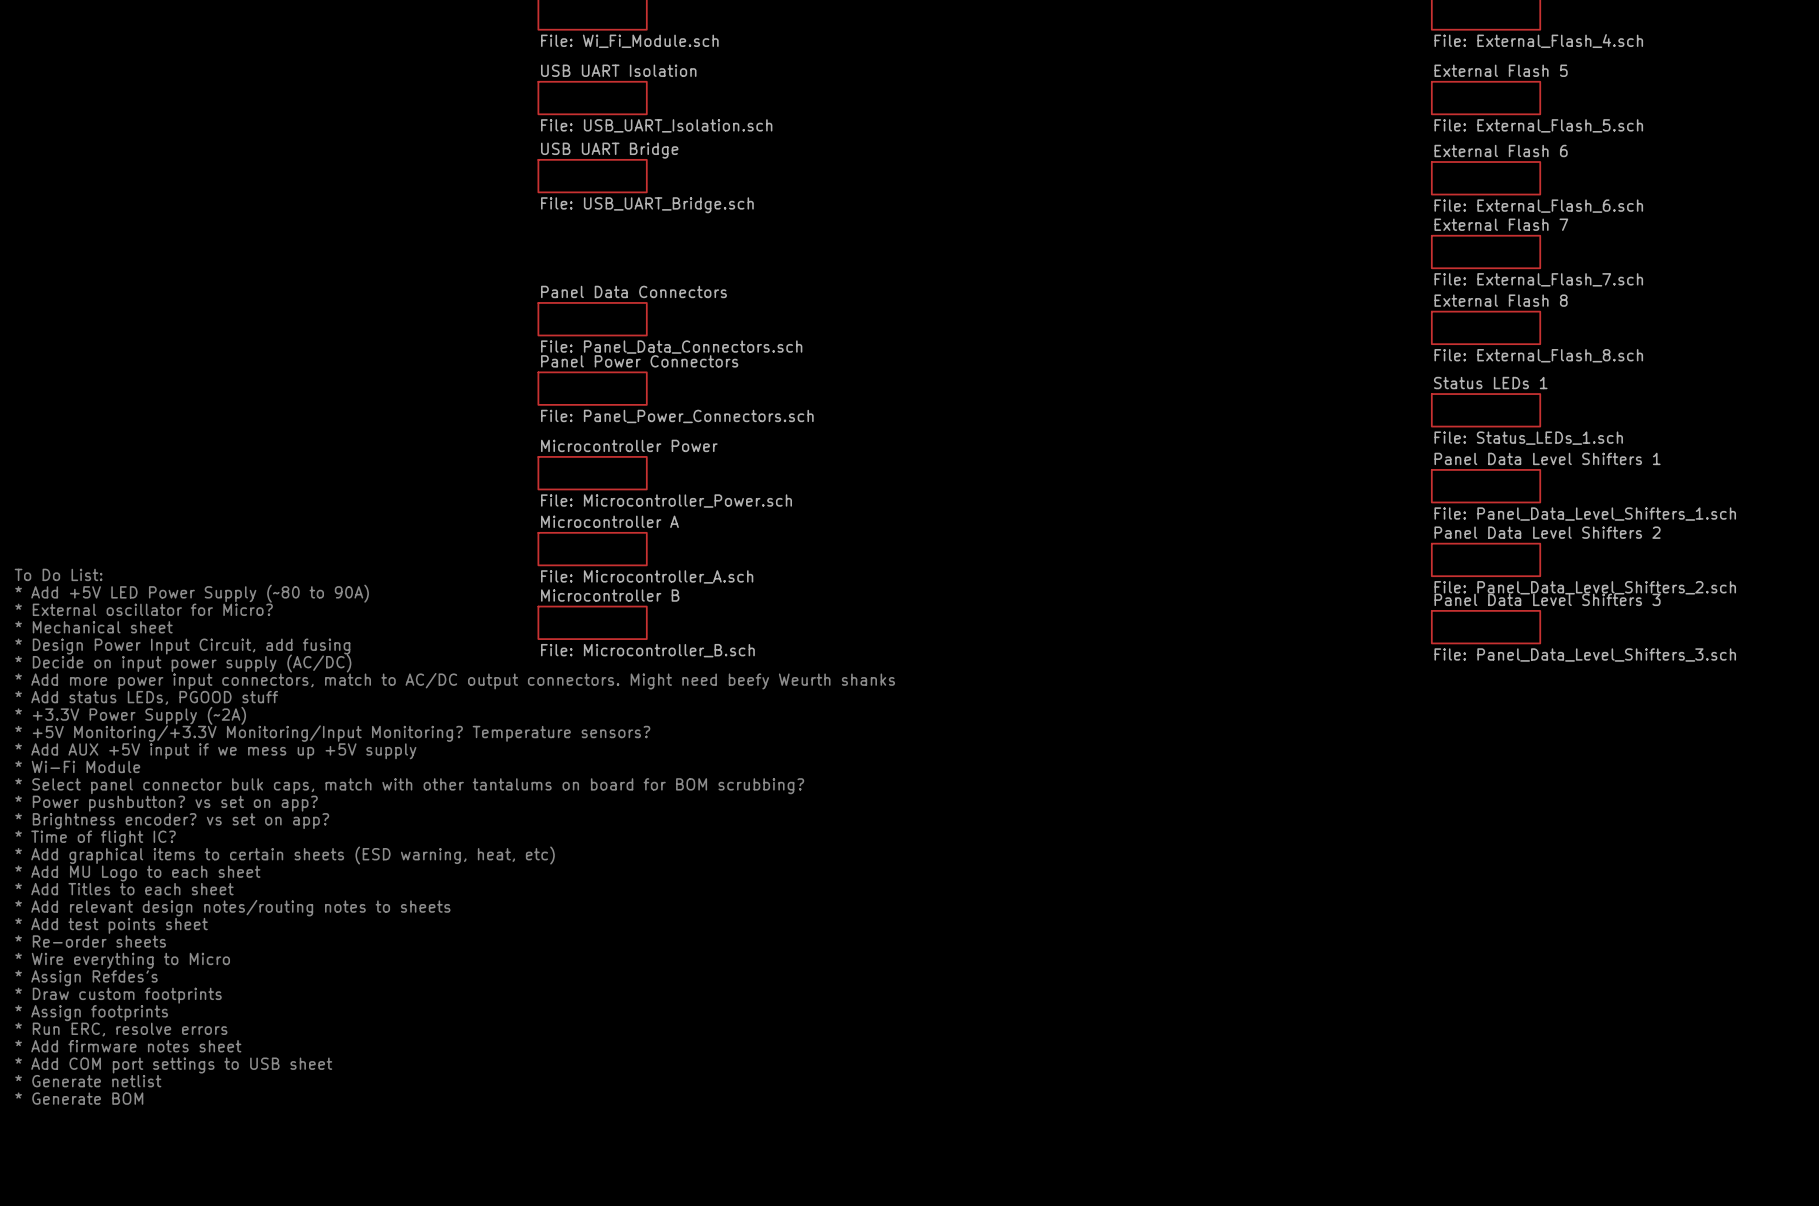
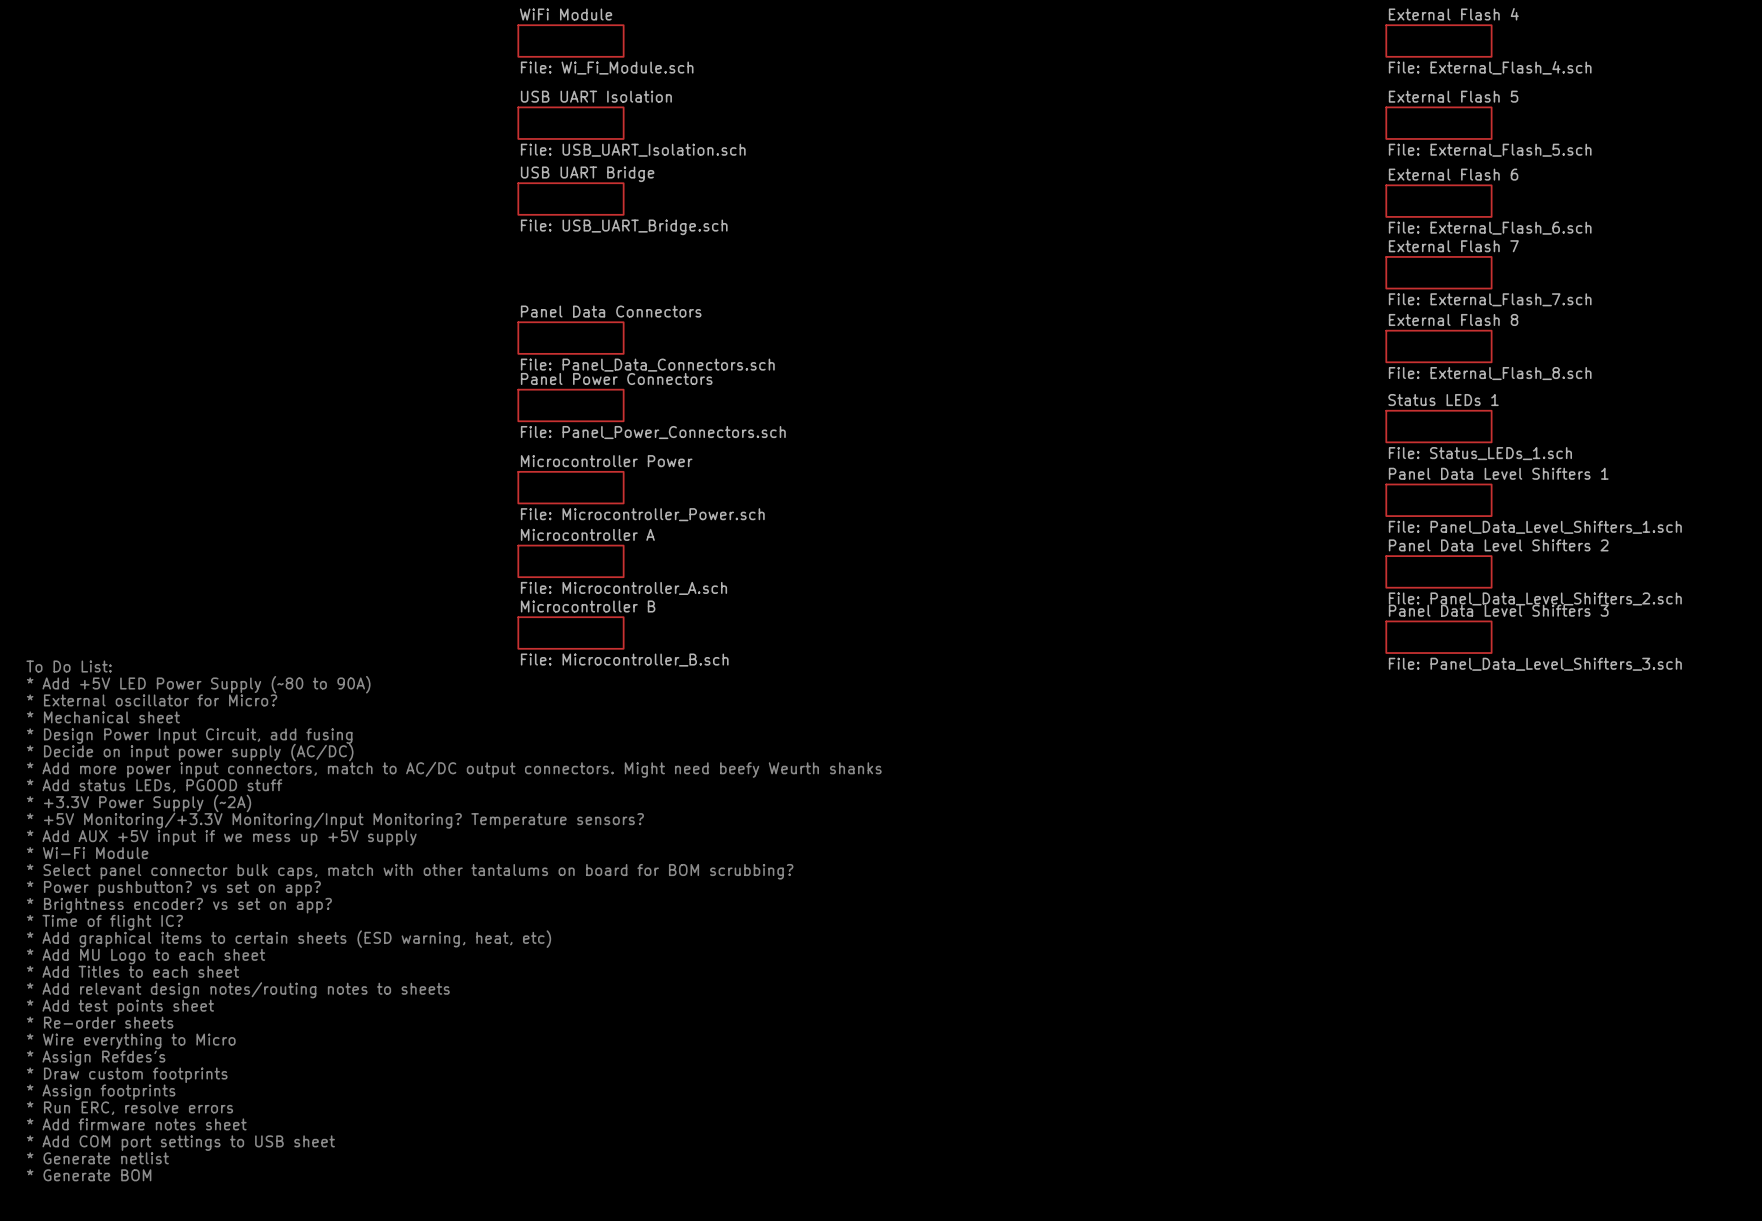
text position: To Do List: (58, 574) -> To Do List: (69, 666)
text position: * Add +5V LED Power Supply (~80 to 90A) (192, 593) -> * Add +5V LED Power Supply (~80 to 90A) (198, 684)
text position: * External oscillator for Micro? (144, 609) -> * External oscillator for Micro? (152, 700)
text position: * Mechanical sheet (93, 627) -> * Mechanical sheet (103, 717)
text position: * Design Power Input Circuit, add fusing (182, 646) -> * Design Power Input Circuit, add fusing (189, 736)
text position: * Decide on input power supply (AC/DC) (183, 663) -> * Decide on input power supply (AC/DC) (190, 752)
text position: * Add more power input connectors, match to AC/DC output connectors. Might need beefy Weurth shanks (455, 681) -> * Add more power input connectors, match to AC/DC output connectors. Might need beefy Weurth shanks (454, 769)
text position: * Add status LEDs, PGOOD stuff (146, 697) -> * Add status LEDs, PGOOD stuff (154, 785)
text position: * +3.3V Power Supply (~2A) (130, 715) -> * +3.3V Power Supply (~2A) (139, 803)
text position: * +5V Monitoring/+3.3V Monitoring/Input Monitoring? Temperature sensors? (332, 733) -> * +5V Monitoring/+3.3V Monitoring/Input Monitoring? Temperature sensors? (335, 820)
text position: * Add AUX +5V input if we mess up +5V supply (215, 751) -> * Add AUX +5V input if we mess up +5V supply (221, 837)
text position: * Wi-Fi Module (77, 766) -> * Wi-Fi Module (87, 853)
text position: * Select panel connector bulk caps, match with other tantalums on board for BOM scrubbing? (409, 786) -> * Select panel connector bulk caps, match with other tantalums on board for BOM scrubbing? (410, 871)
text position: * Power pushbutton? vs set on app? (166, 803) -> * Power pushbutton? vs set on app? (173, 888)
text position: * Brightness encoder? vs set on app? (172, 821) -> * Brightness encoder? vs set on app? (179, 905)
text position: * Time of flight IC? (95, 838) -> * Time of flight IC? (104, 922)
text position: * Add graphical items to certain sheets (ESD warning, heat, etc) (285, 855) -> * Add graphical items to certain sheets (ESD warning, heat, etc) (289, 939)
text position: * Add MU Logo to each sheet (137, 873) -> * Add MU Logo to each sheet (146, 956)
text position: * Add Titles to each sheet (124, 889) -> * Add Titles to each sheet (133, 971)
text position: * Add relevant design notes/routing notes to sheets (232, 908) -> * Add relevant design notes/routing notes to sheets (238, 990)
text position: * Add test points sheet (111, 925) -> * Add test points sheet (120, 1007)
text position: * Re-order sheets (90, 941) -> * Re-order sheets (100, 1022)
text position: * Wire everything to Micro (122, 960) -> * Wire everything to Micro (131, 1041)
text position: * Assign Refdes's (86, 978) -> * Assign Refdes's (96, 1058)
text position: * Draw custom footprints (118, 995) -> * Draw custom footprints (127, 1075)
text position: * Assign footprints (91, 1013) -> * Assign footprints (101, 1092)
text position: * Run ERC, resolve errors (121, 1029) -> * Run ERC, resolve errors (129, 1108)
text position: * Add firmware notes sheet (128, 1046) -> * Add firmware notes sheet (136, 1124)
text position: * Add COM port settings to USB sheet (173, 1065) -> * Add COM port settings to USB sheet (180, 1143)
text position: * Generate netlist (88, 1081) -> * Generate netlist (97, 1158)
text position: * Generate BOM (79, 1098) -> * Generate BOM (89, 1175)

